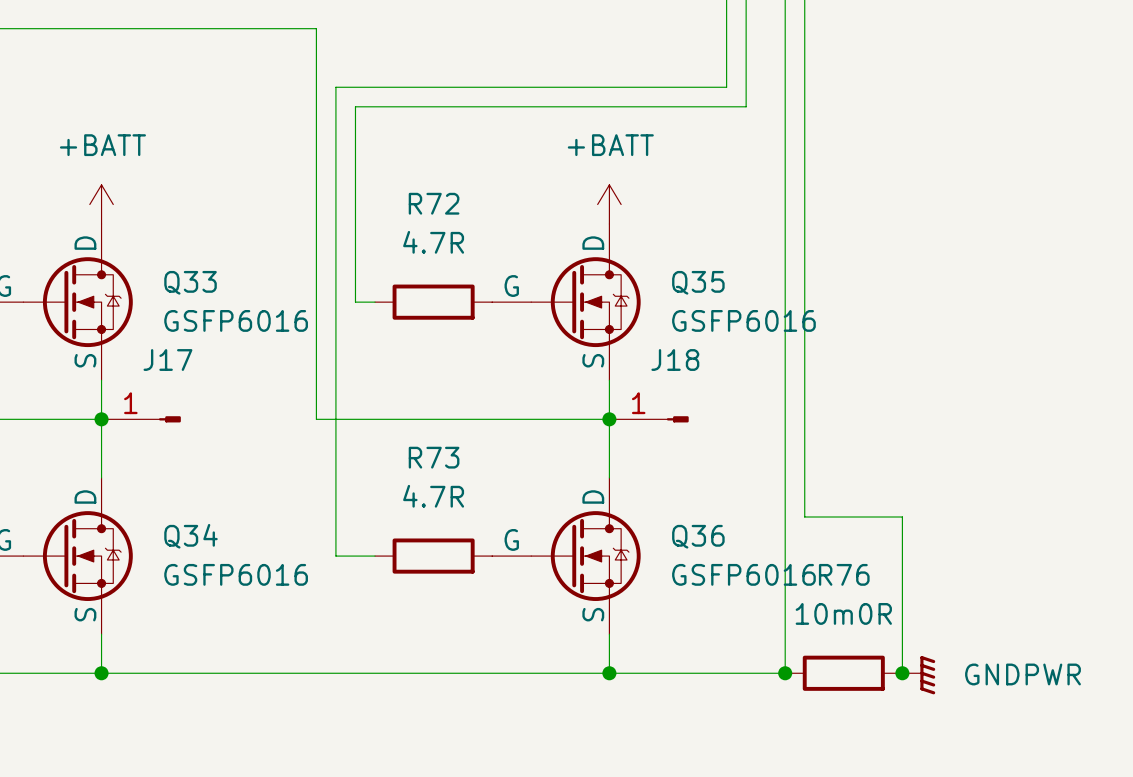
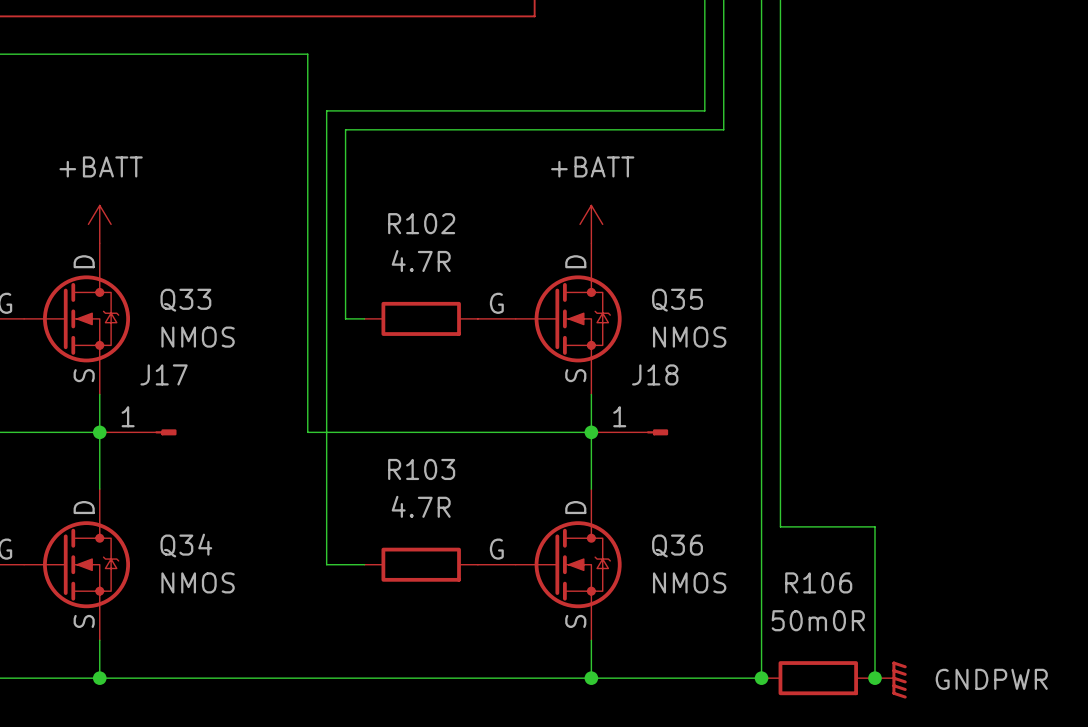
R72 name: R72 (434, 203) -> R102 (421, 223)
Q33 value: GSFP6016 (236, 320) -> NMOS (198, 337)
Q35 value: GSFP6016 (743, 320) -> NMOS (689, 337)
R73 name: R73 (434, 457) -> R103 (421, 469)
Q34 value: GSFP6016 (236, 574) -> NMOS (198, 582)
Q36 value: GSFP6016 (743, 574) -> NMOS (689, 582)
R76 name: R76 (844, 574) -> R106 (818, 582)
R76 value: 10m0R (843, 613) -> 50m0R (818, 620)

